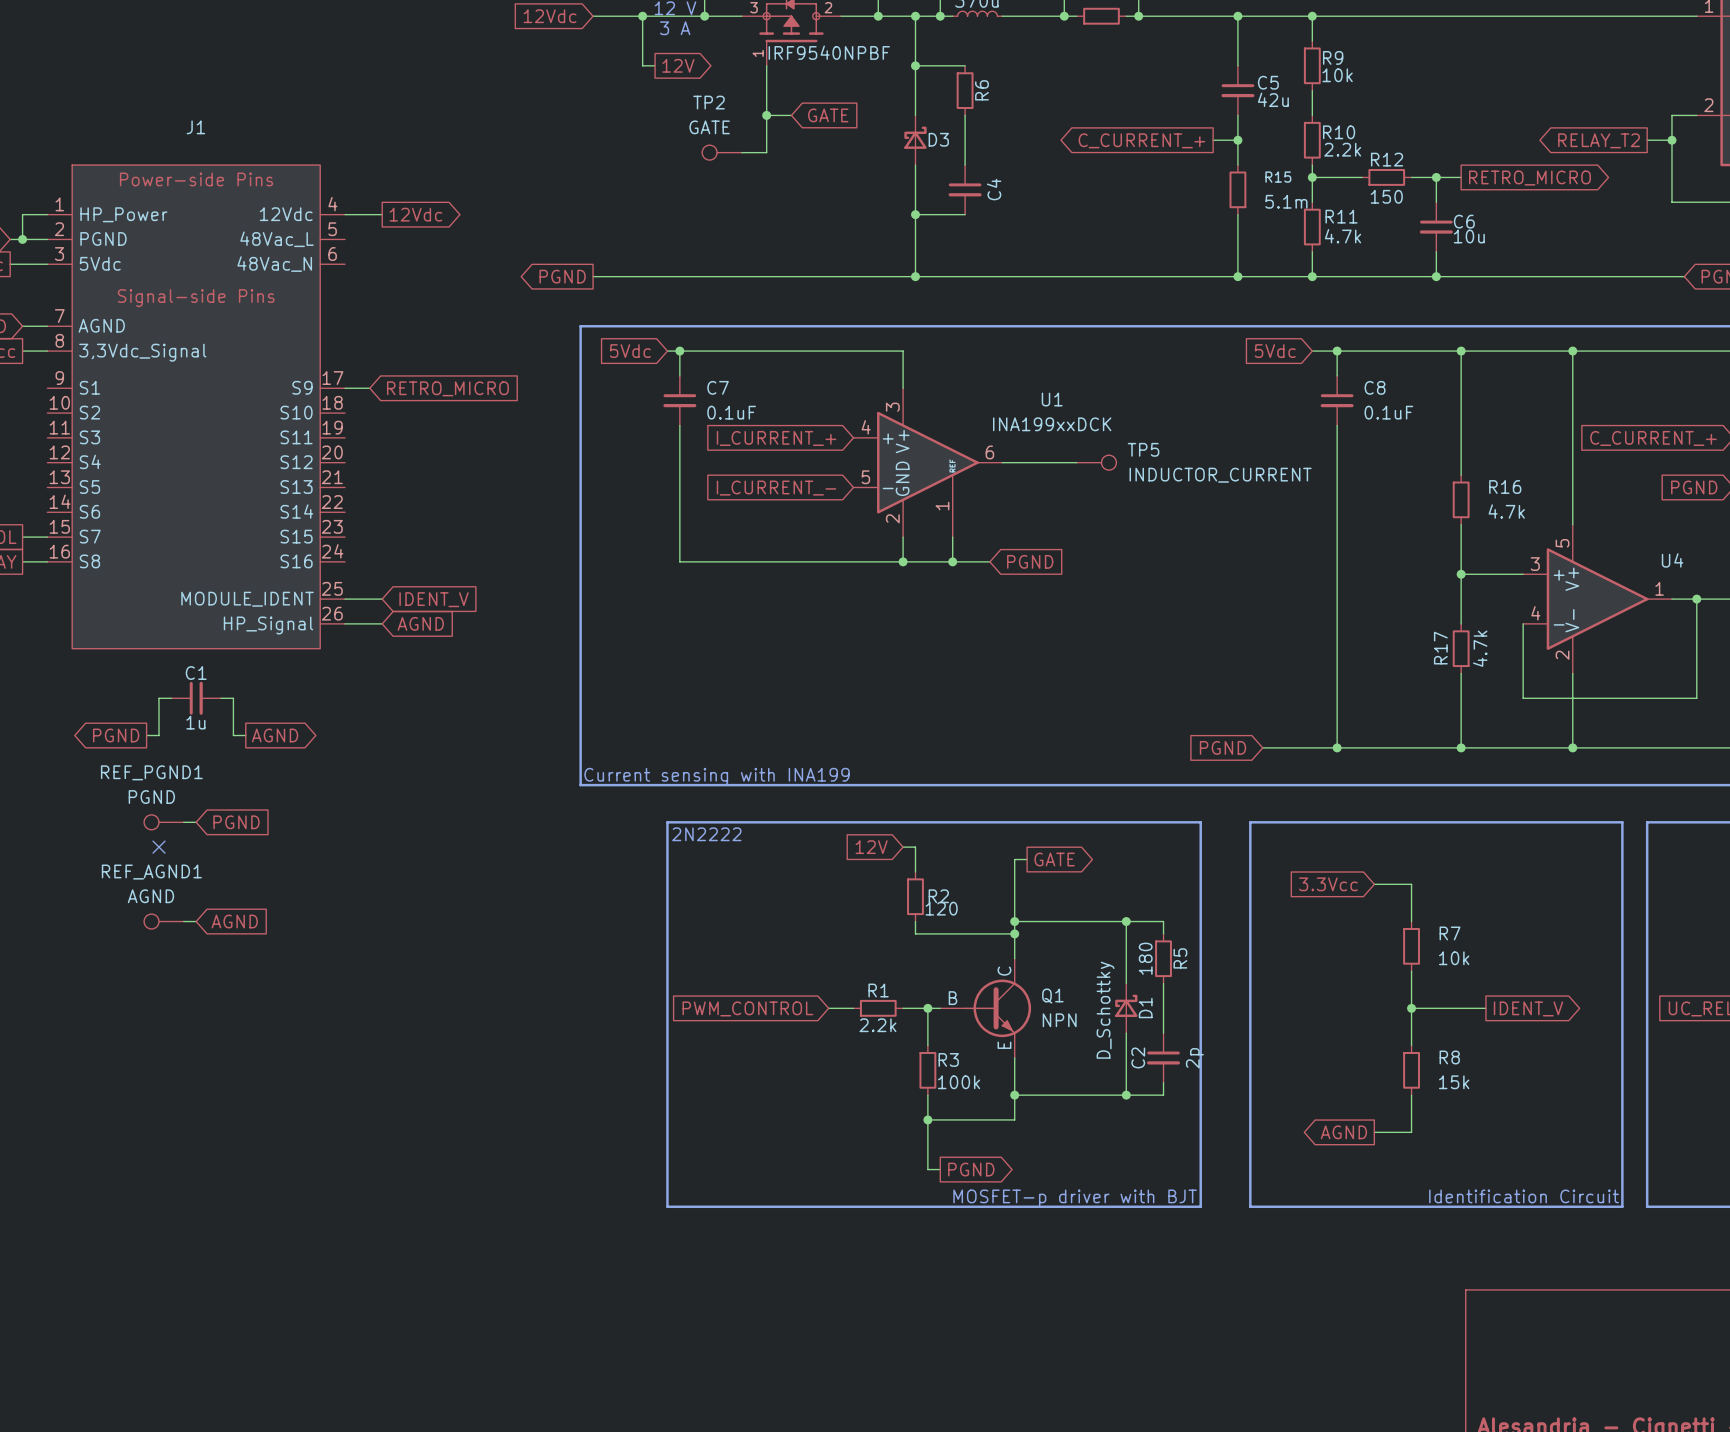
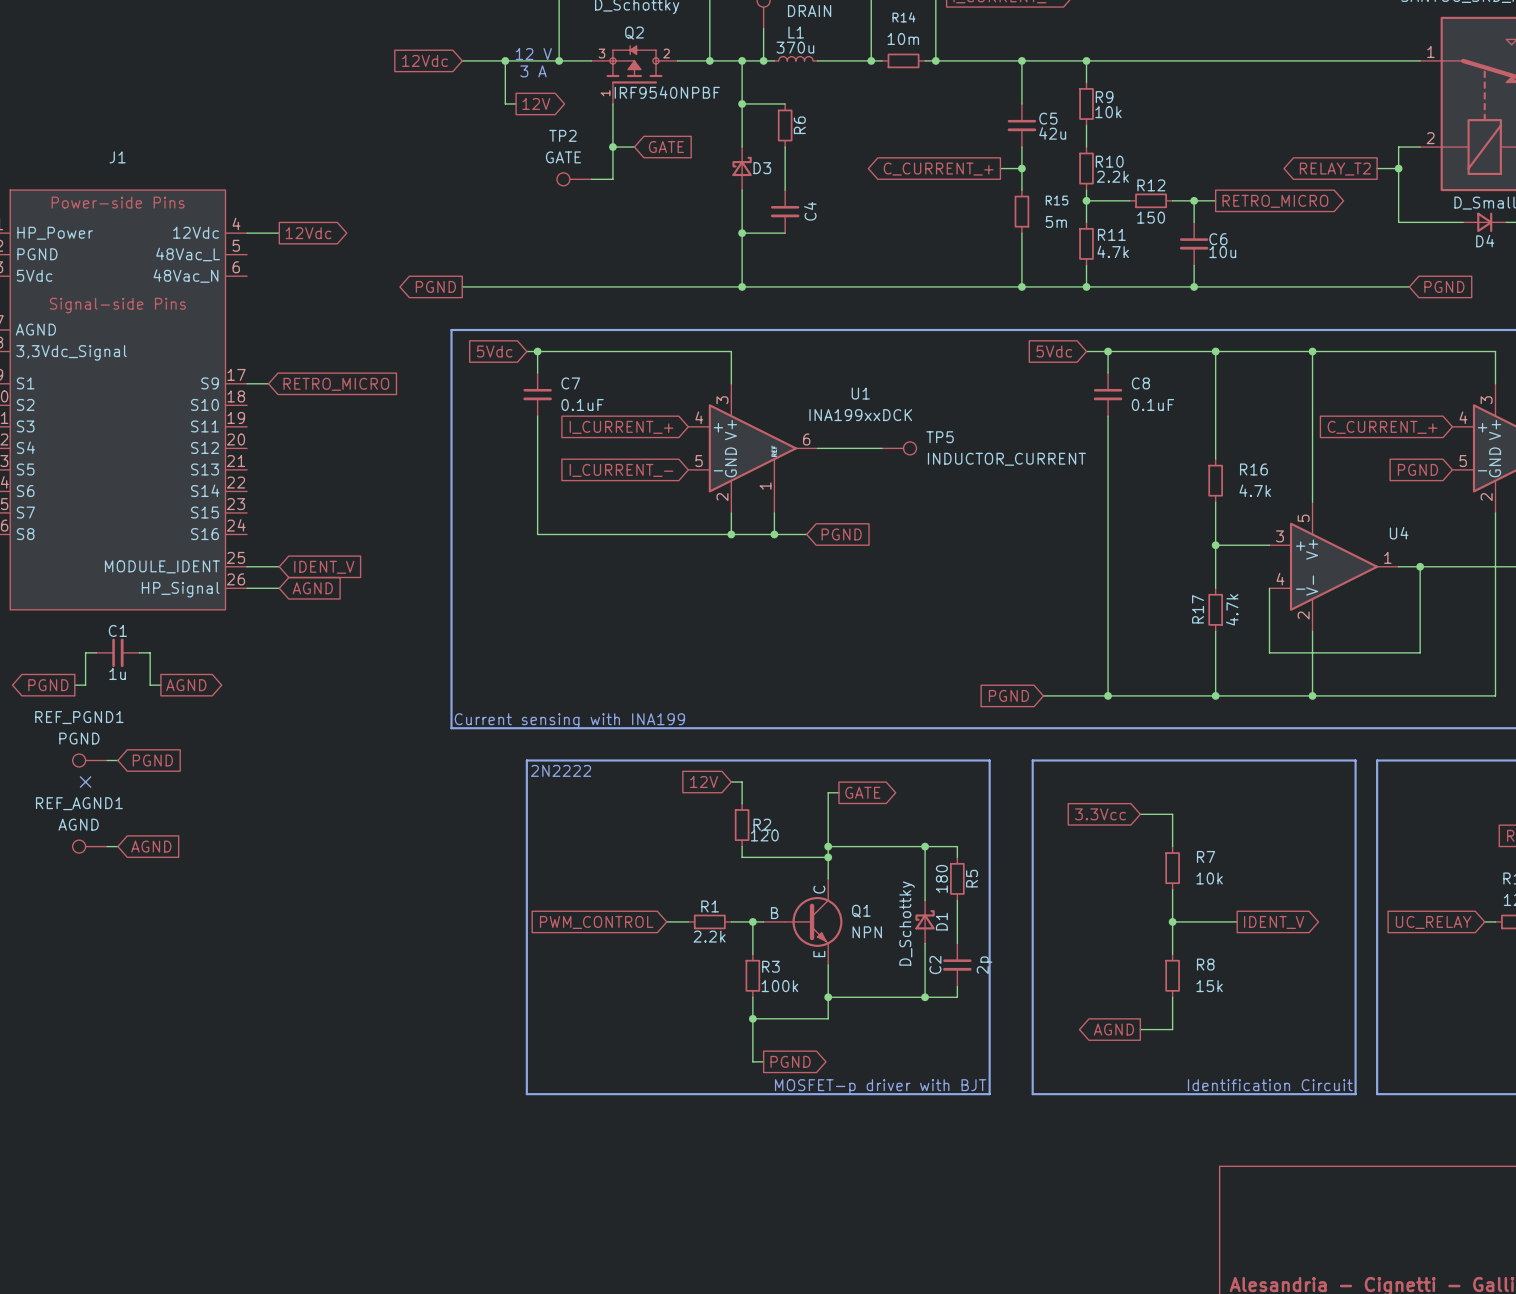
R15 value: 5.1m (1286, 201) -> 5m (1056, 221)

